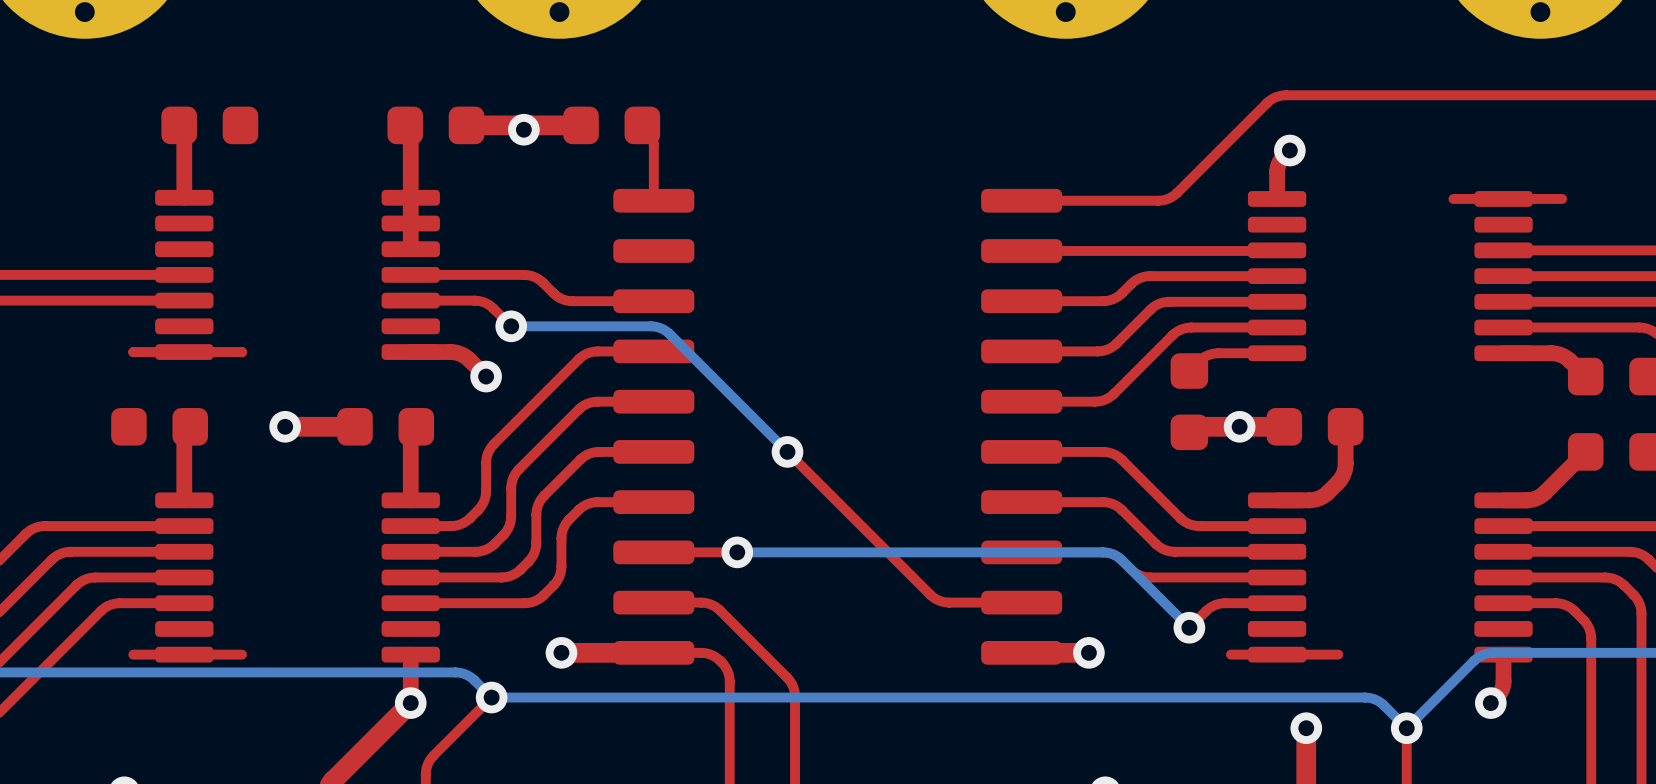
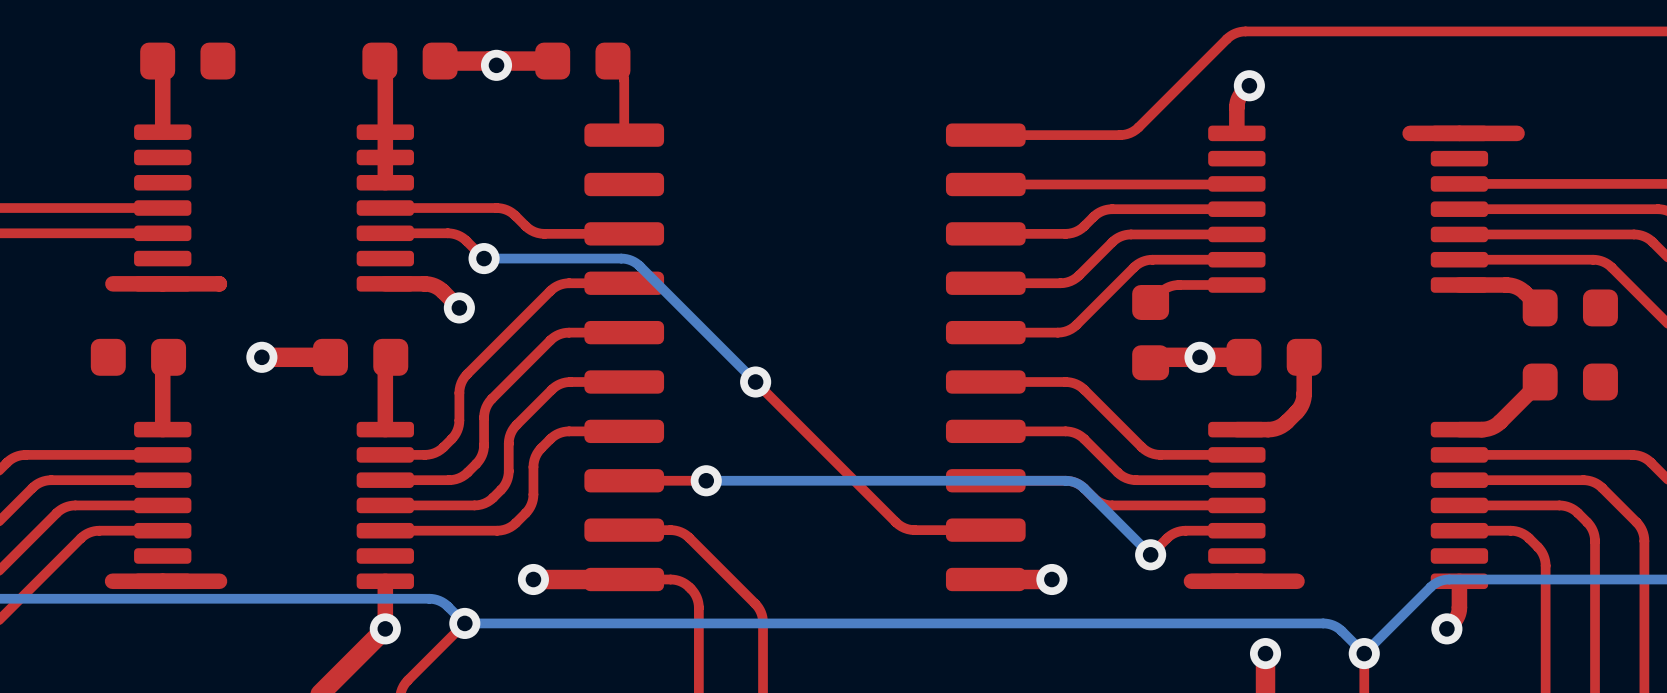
top track width: thin (1562, 198) (1453, 198) -> thick (1517, 133) (1410, 133)
top track width: thin (241, 352) (133, 352) -> thick (219, 283) (112, 283)
top track width: thin (242, 654) (133, 654) -> thick (219, 581) (112, 581)
top track width: thin (1338, 654) (1230, 654) -> thick (1297, 581) (1191, 581)

